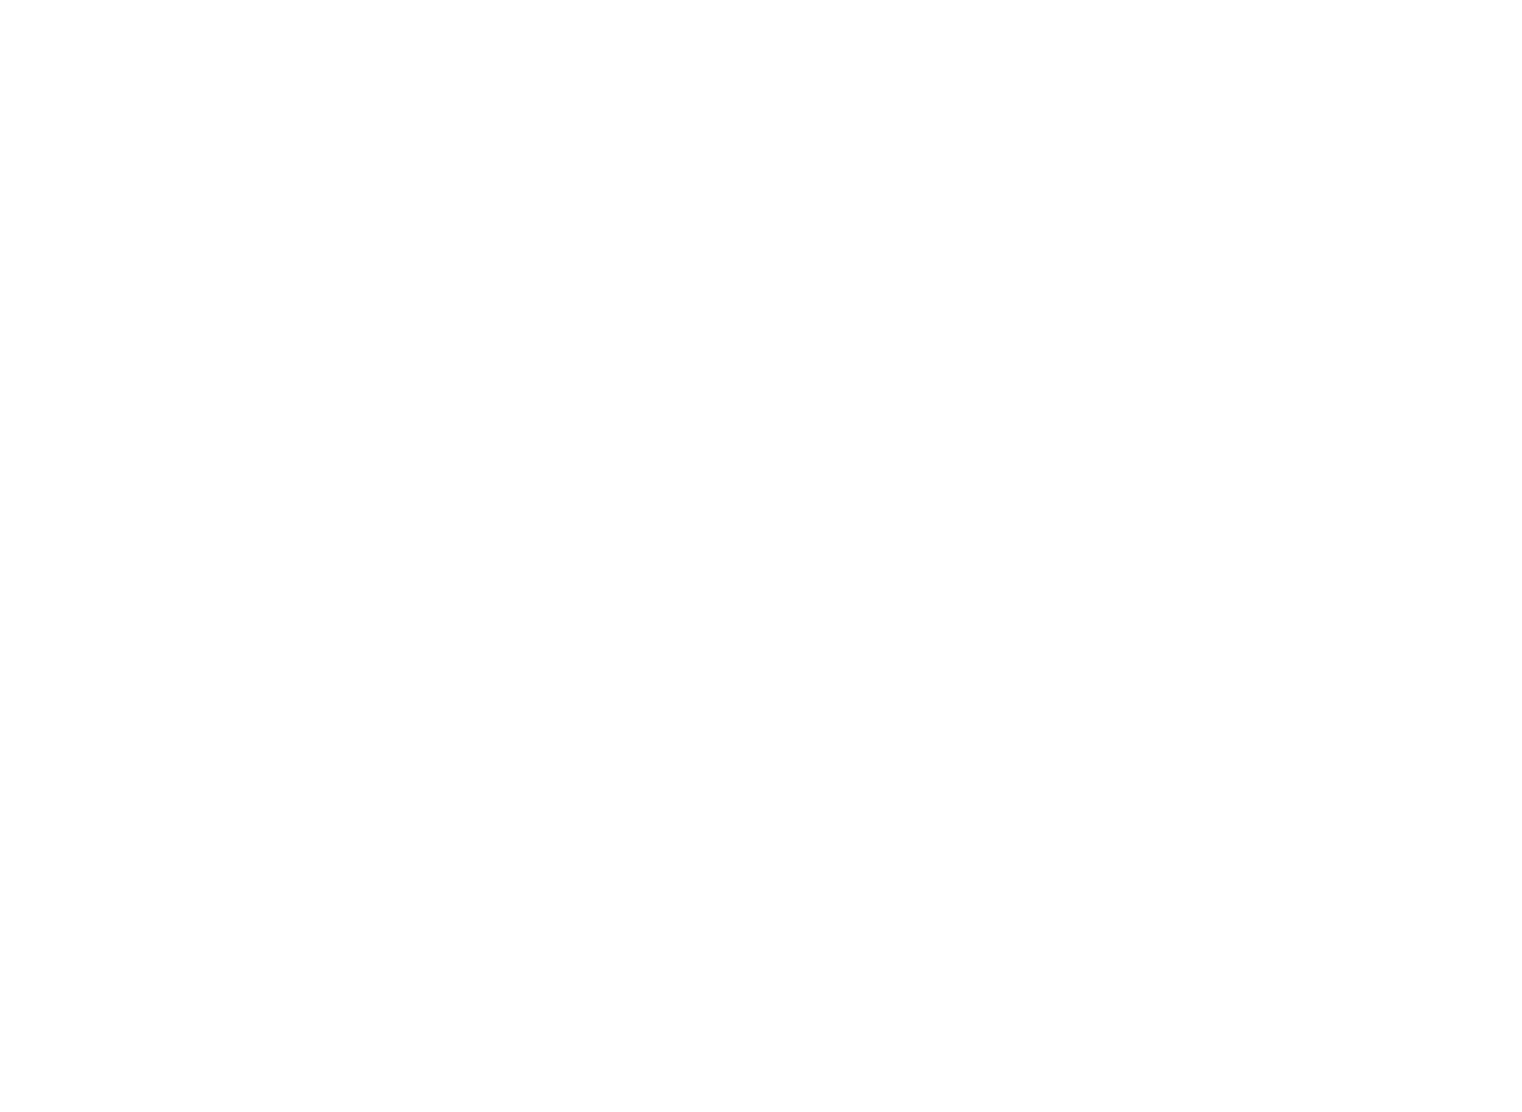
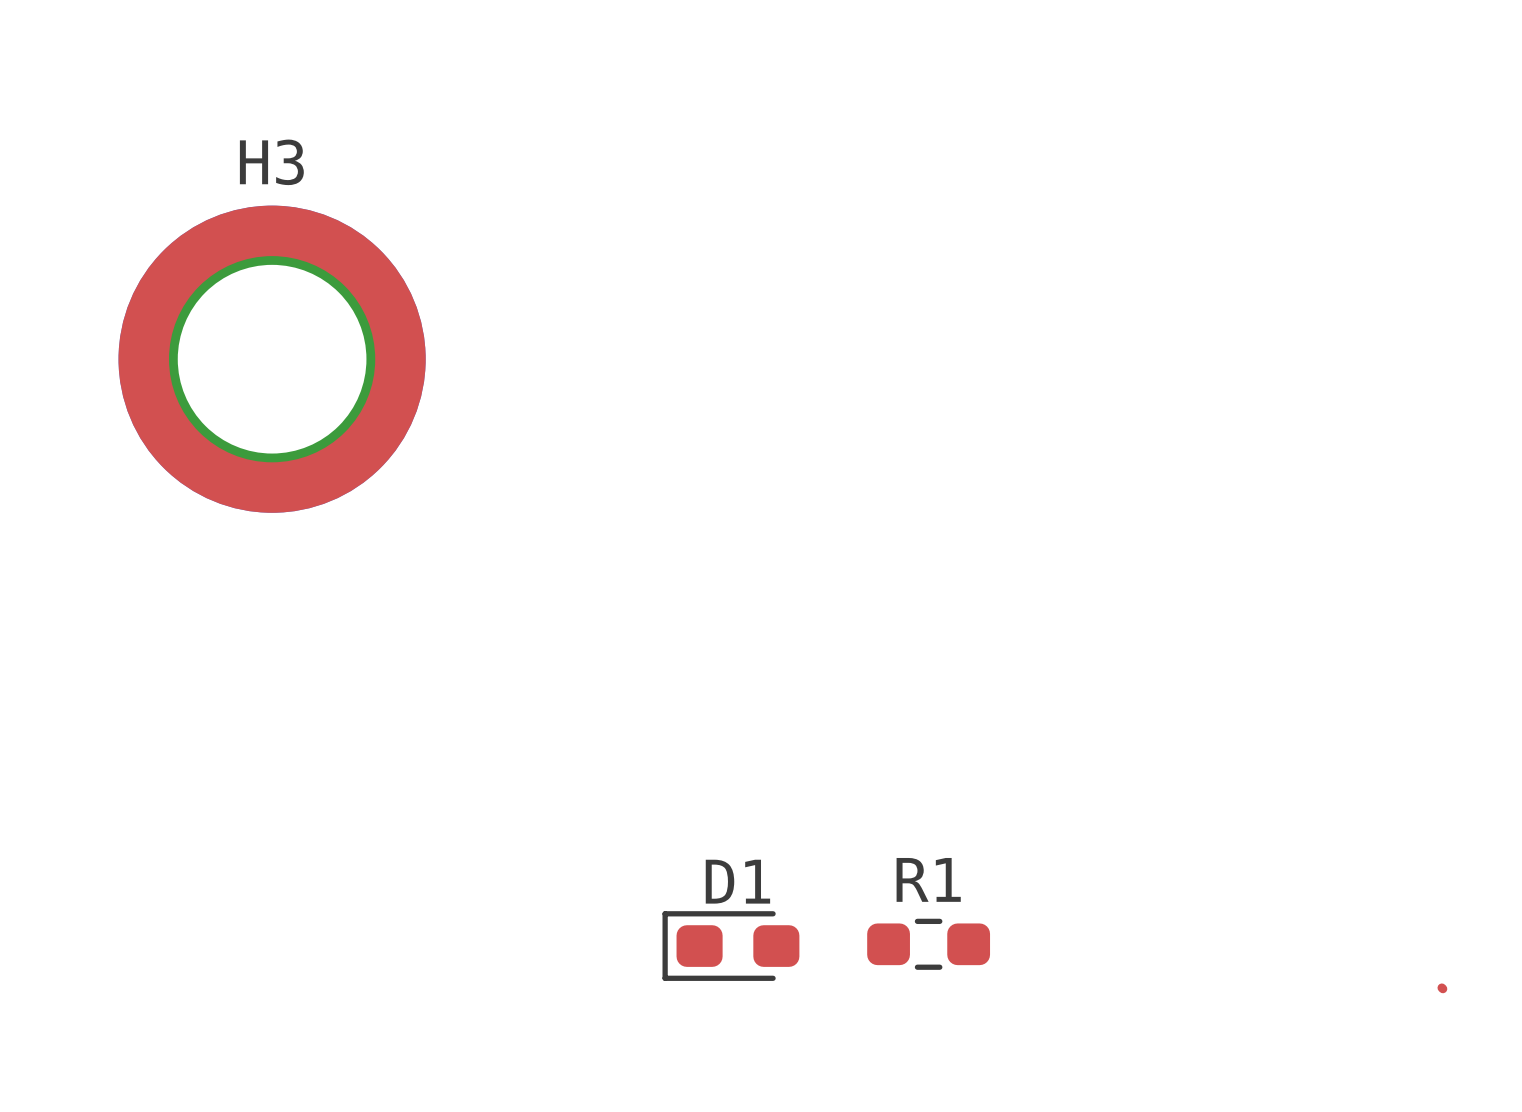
H3: none -> (272, 359)
R1: none -> (928, 944)
D1: none -> (730, 946)
top track: none -> (1441, 987) (1442, 988)

